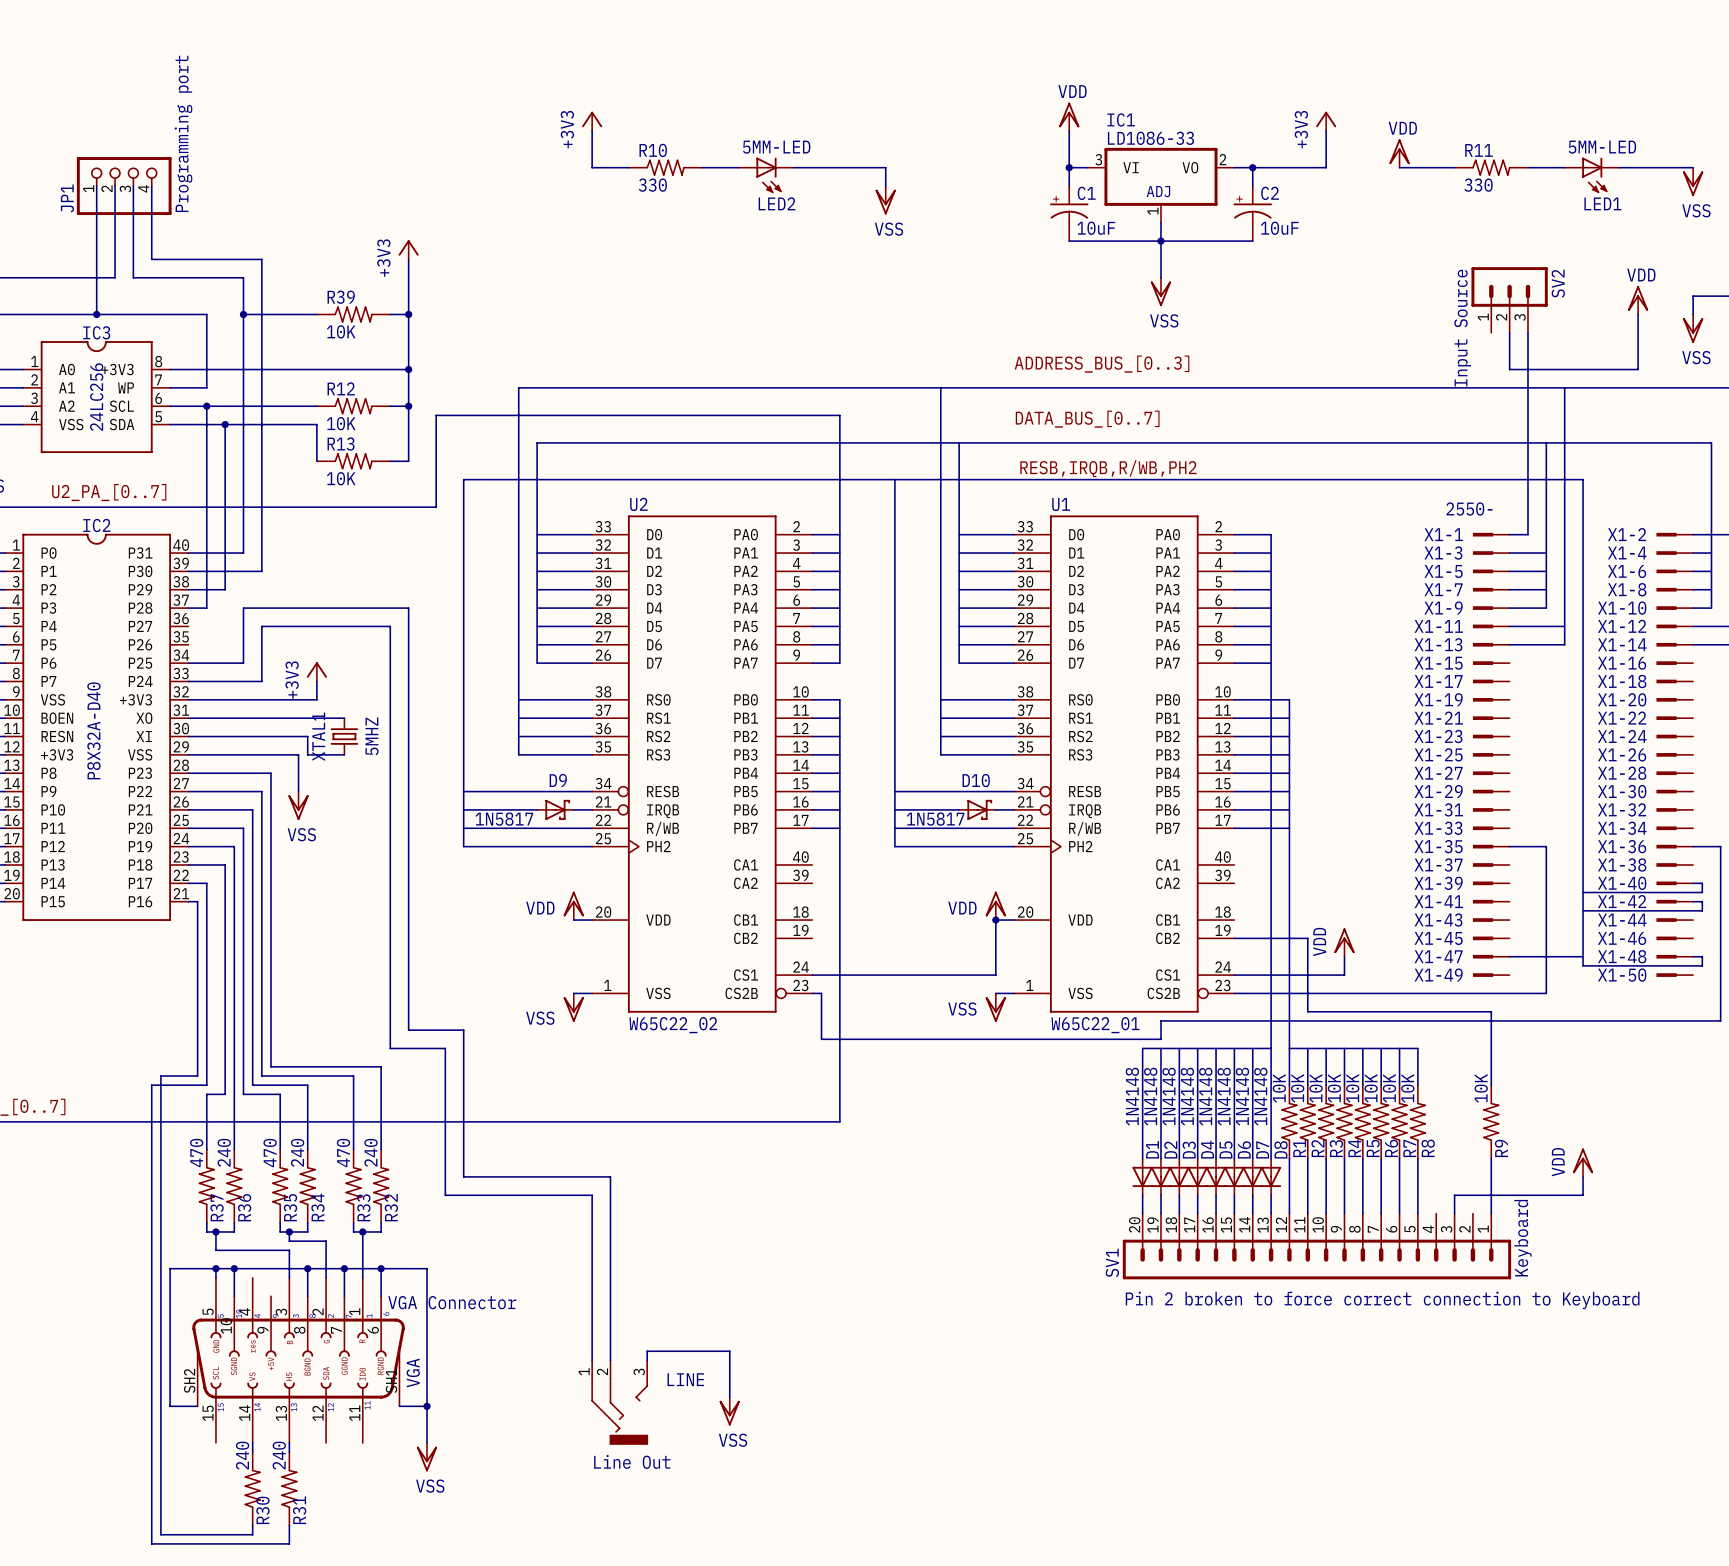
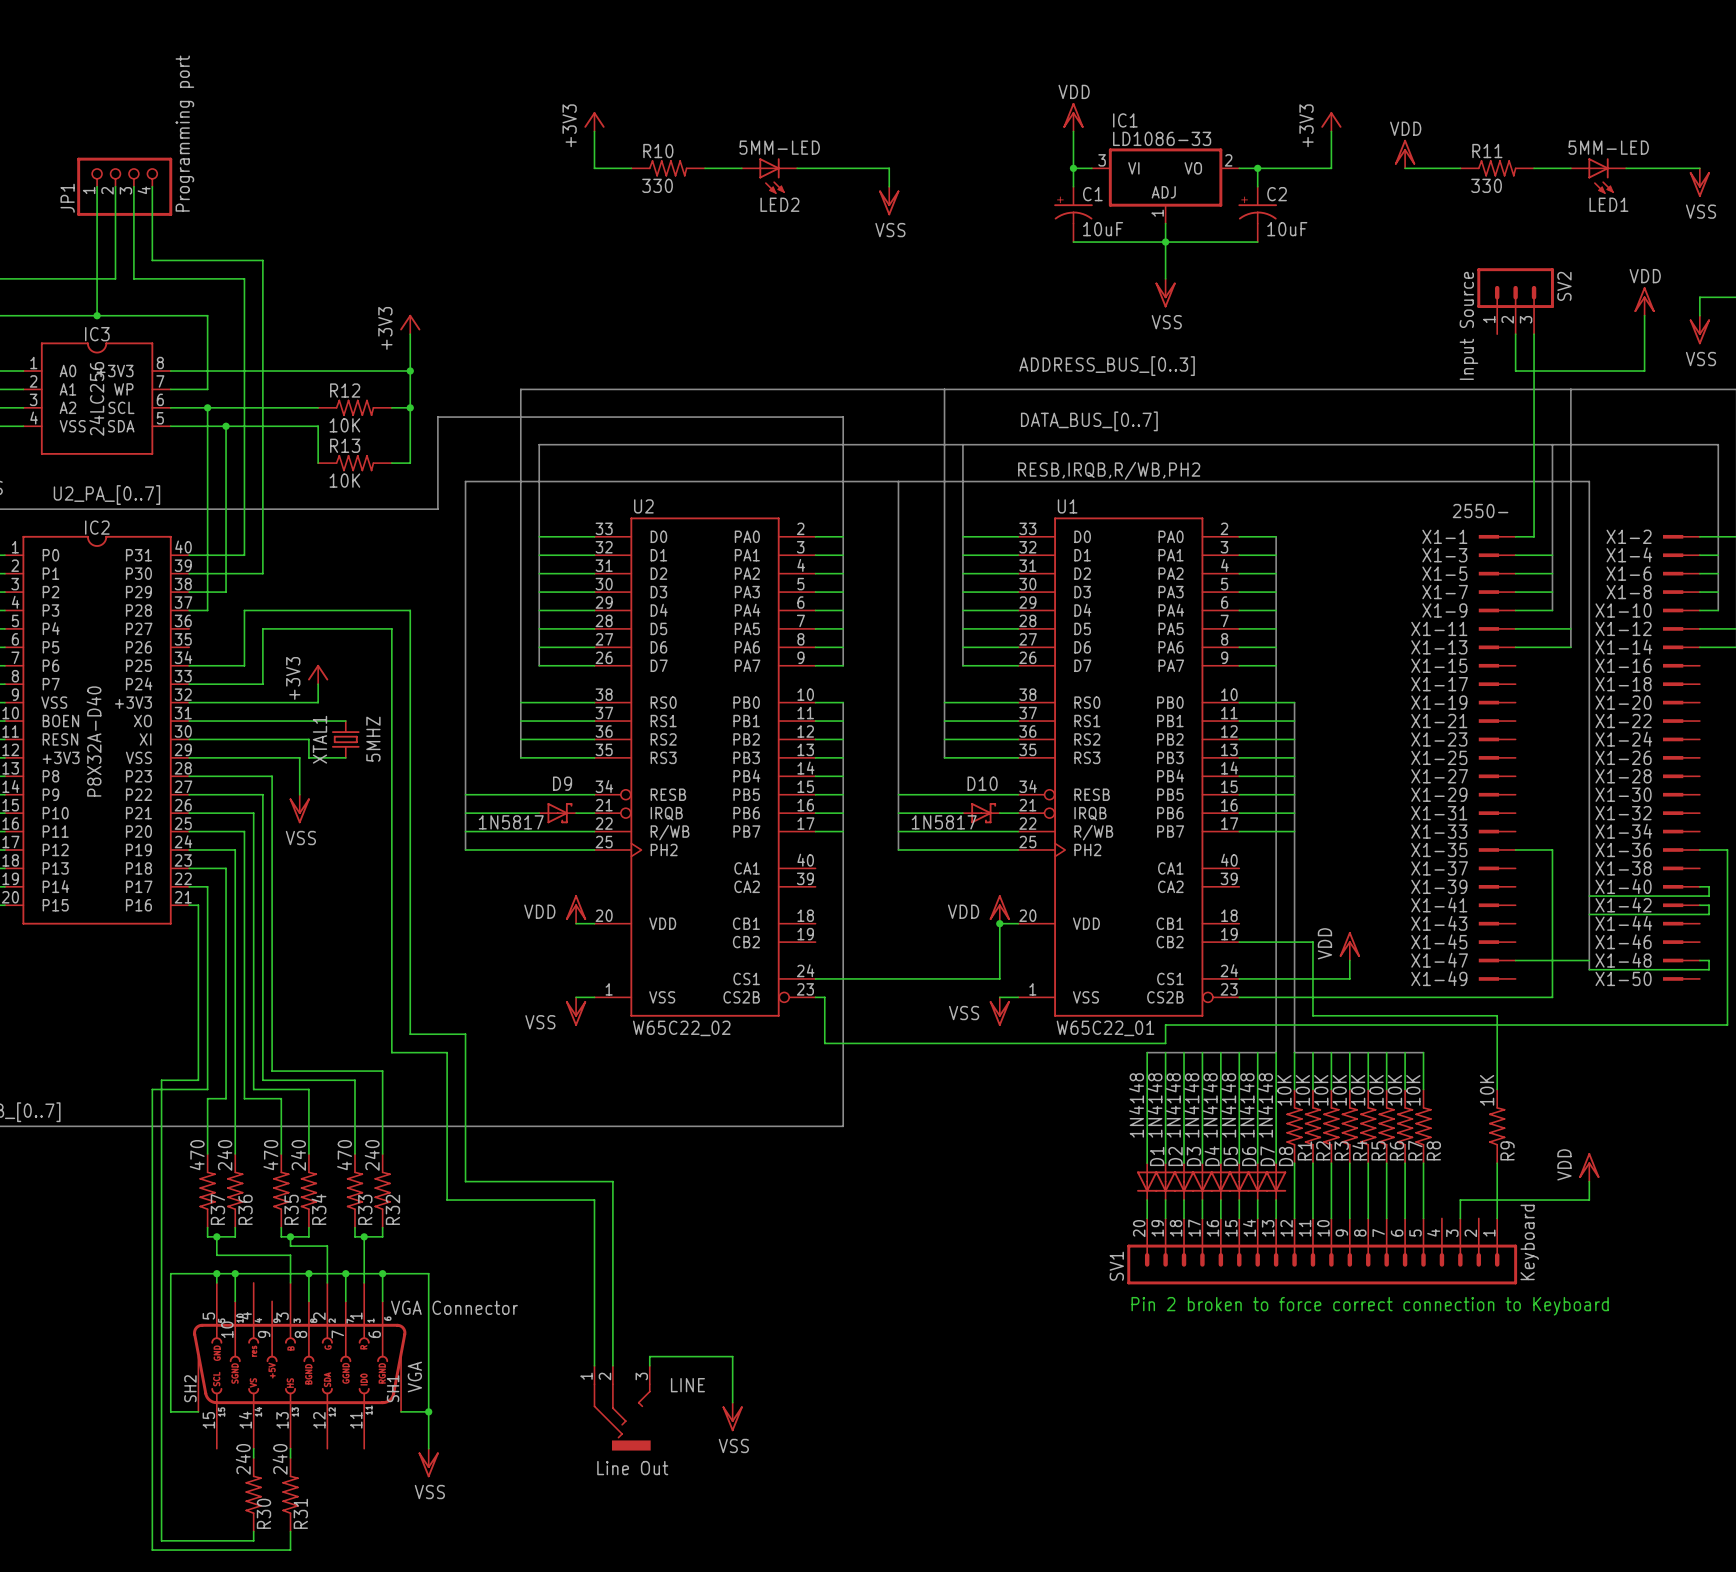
power symbol position: +3V3 (408, 249) -> +3V3 (410, 324)
wire: (408, 259) (408, 332) -> none
wire: (243, 314) (316, 314) -> none
junction: (243, 314) -> none
R39: 10K (353, 314) -> none
wire: (390, 314) (408, 314) -> none
junction: (408, 314) -> none

